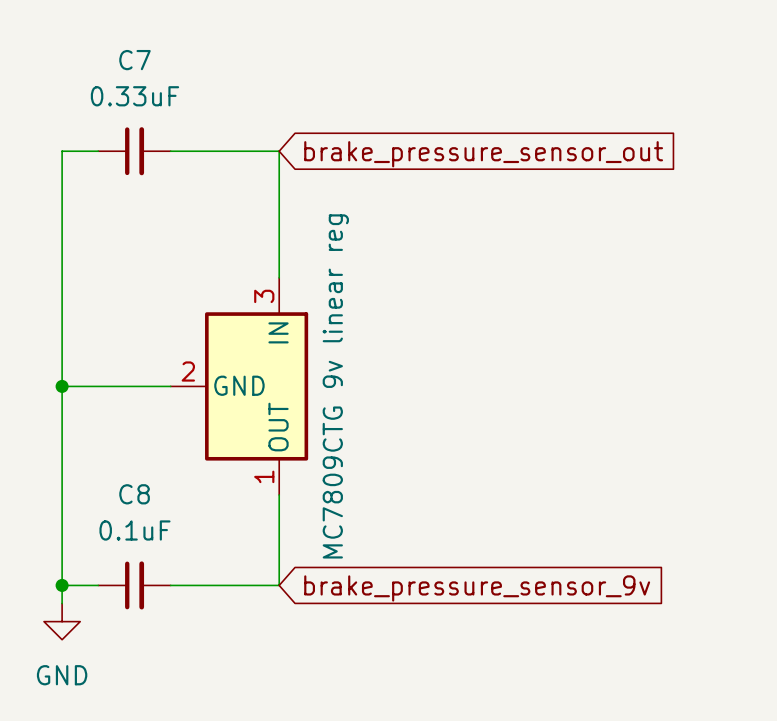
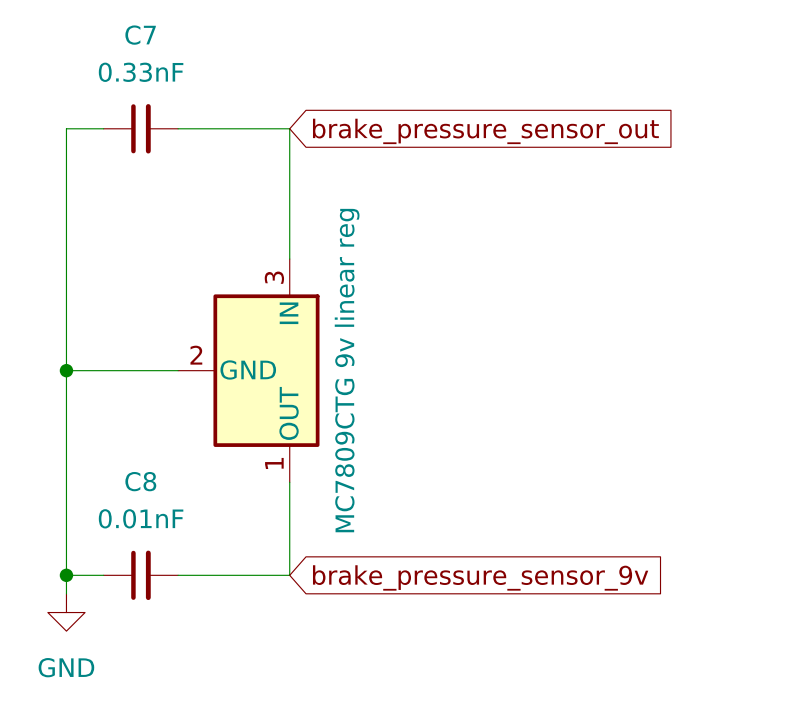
C7 value: 0.33uF (134, 96) -> 0.33nF (141, 72)
C8 value: 0.1uF (134, 530) -> 0.01nF (141, 518)

